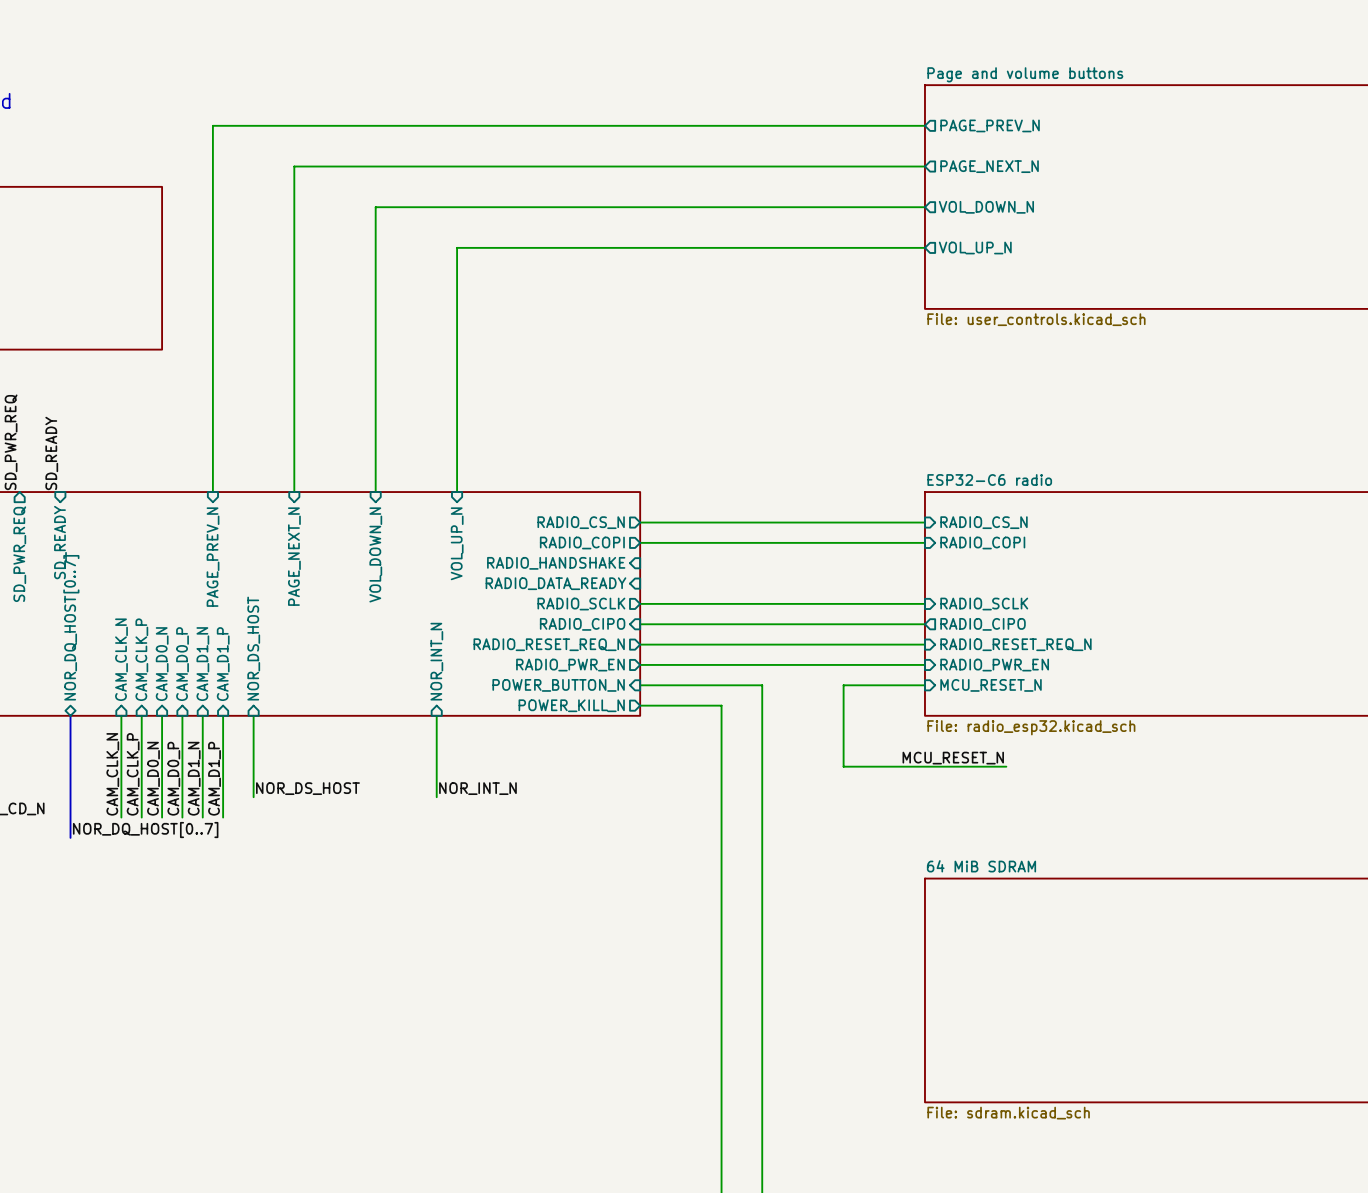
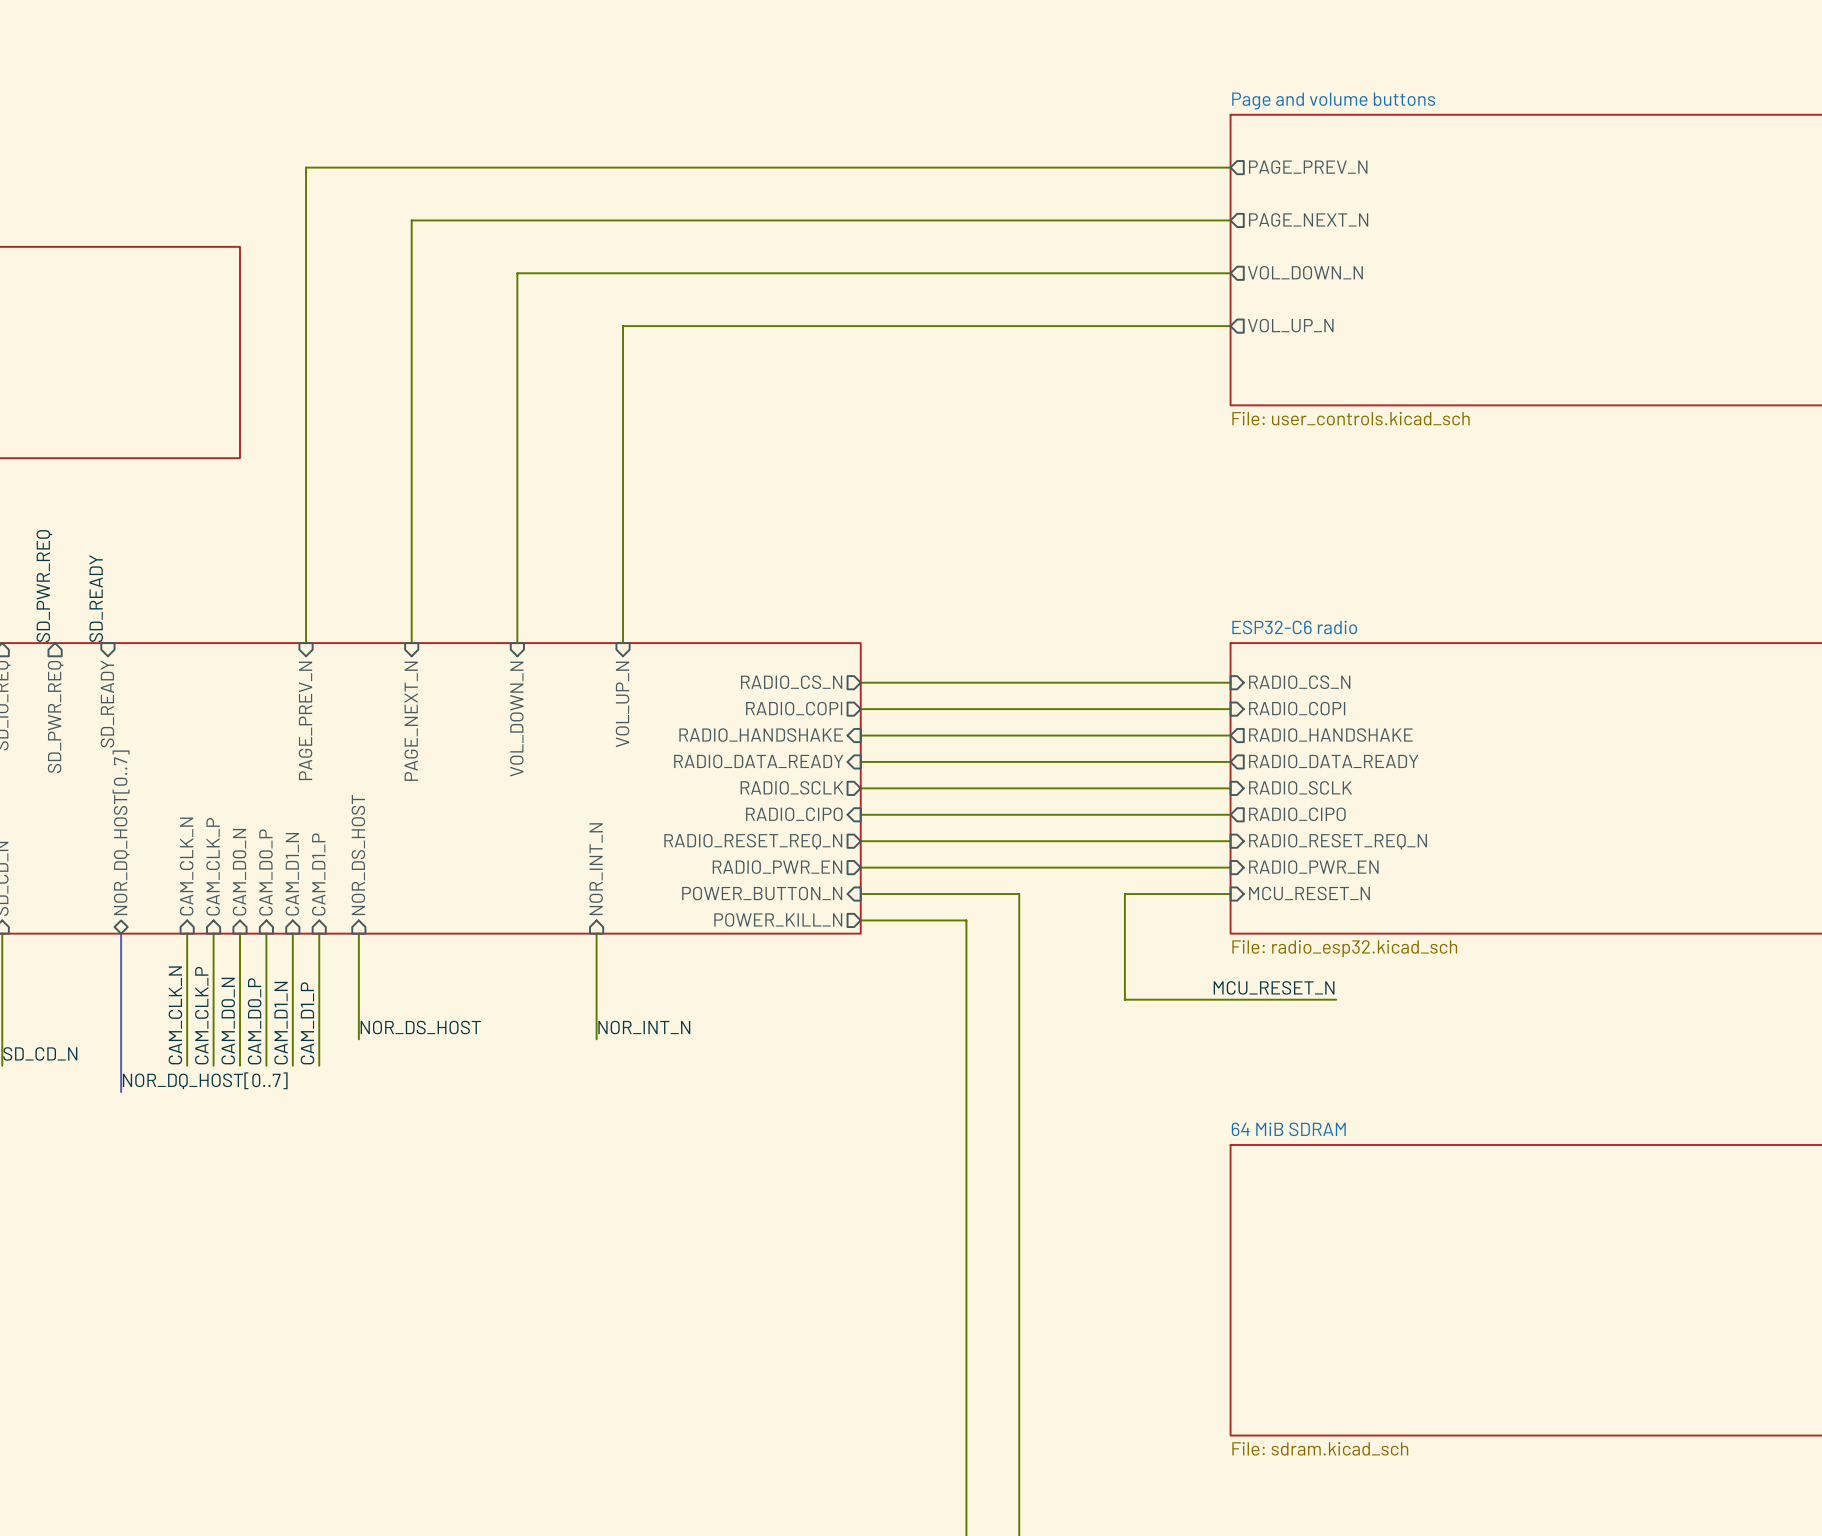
wire: none -> (860, 735) (1230, 735)
sheet pin: none -> RADIO_HANDSHAKE (1330, 735)
wire: none -> (860, 761) (1230, 761)
sheet pin: none -> RADIO_DATA_READY (1333, 761)

